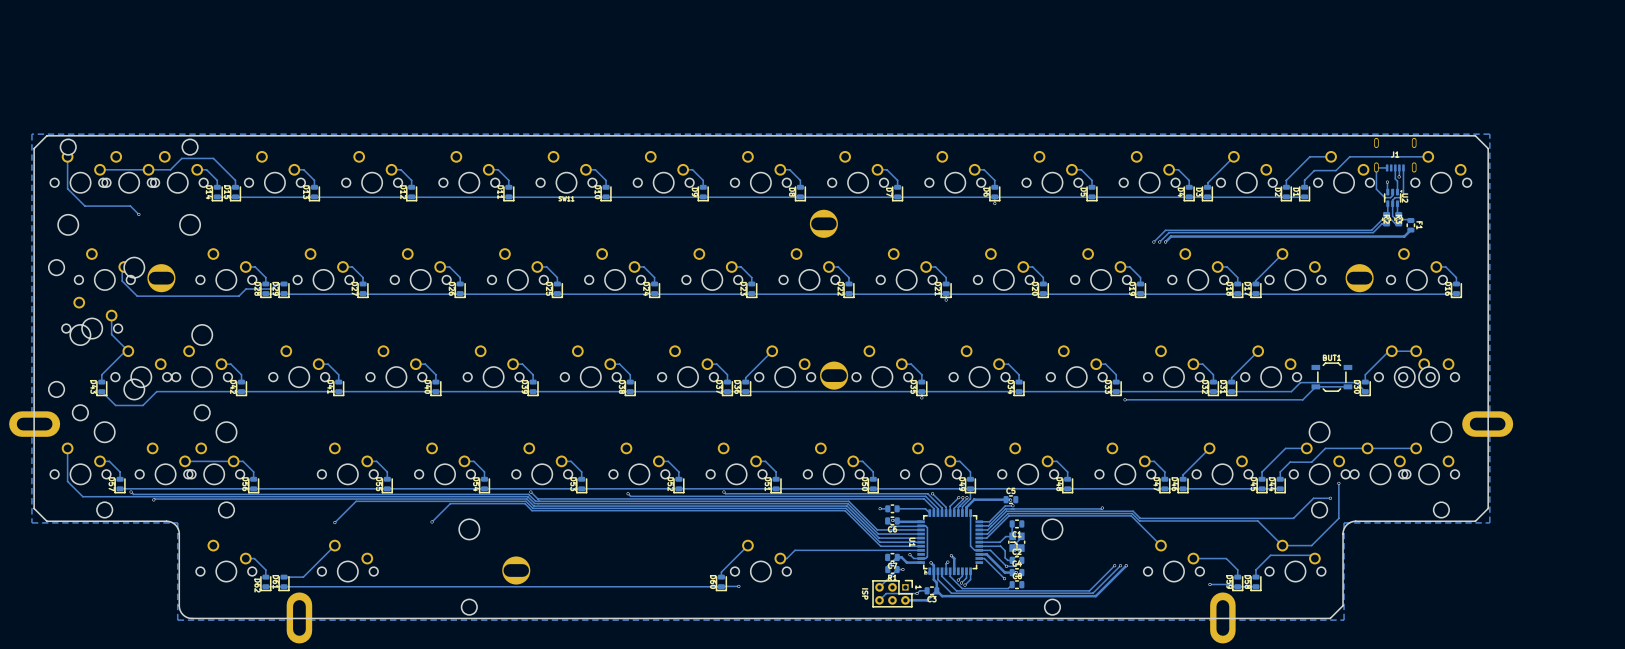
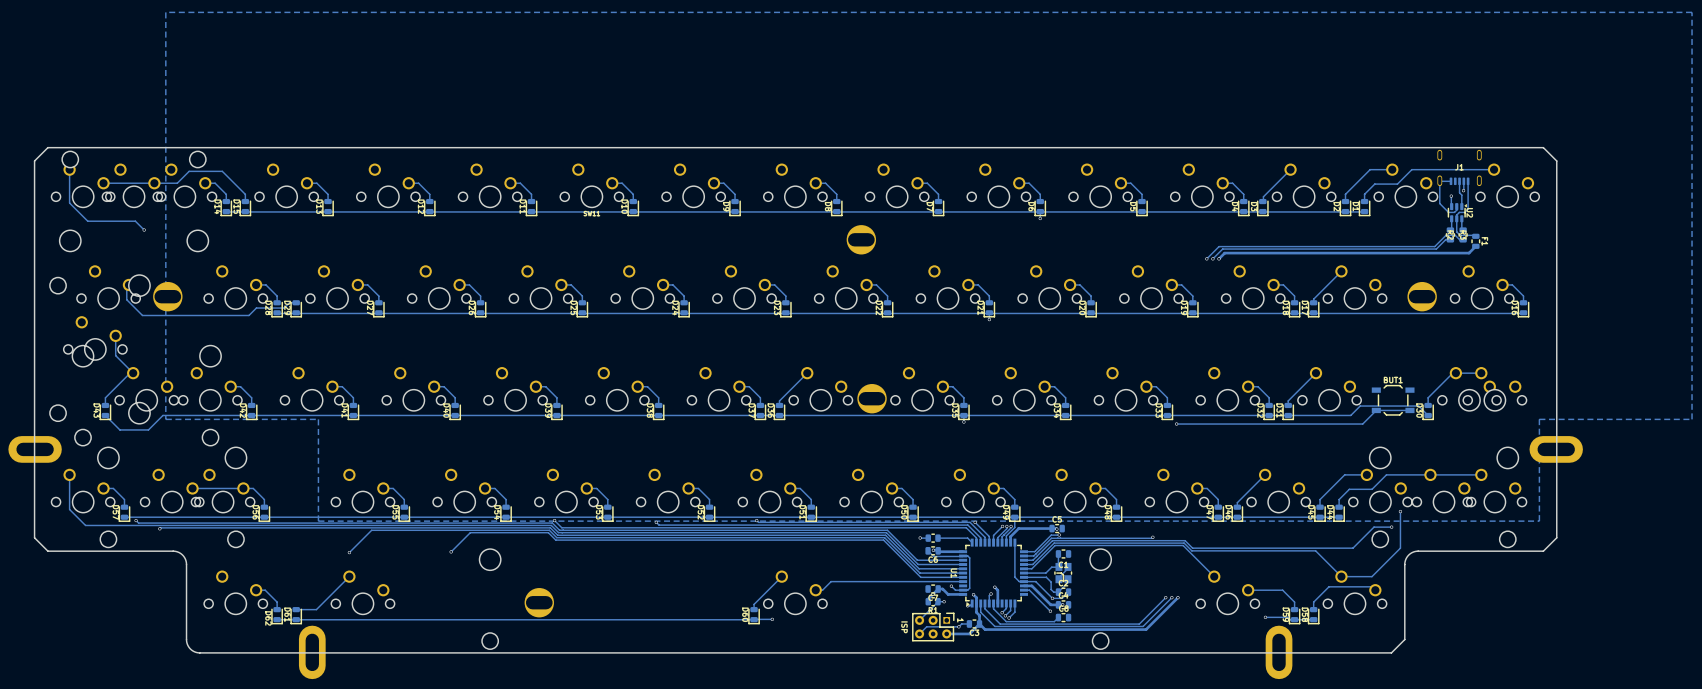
zone outline: (1489, 134) (31, 134) (31, 522) (177, 522) (177, 620) (1344, 620) (1344, 522) (1489, 522) (1489, 134) -> (1692, 12) (165, 12) (165, 419) (318, 419) (318, 521) (1539, 521) (1539, 419) (1692, 419) (1692, 12)

